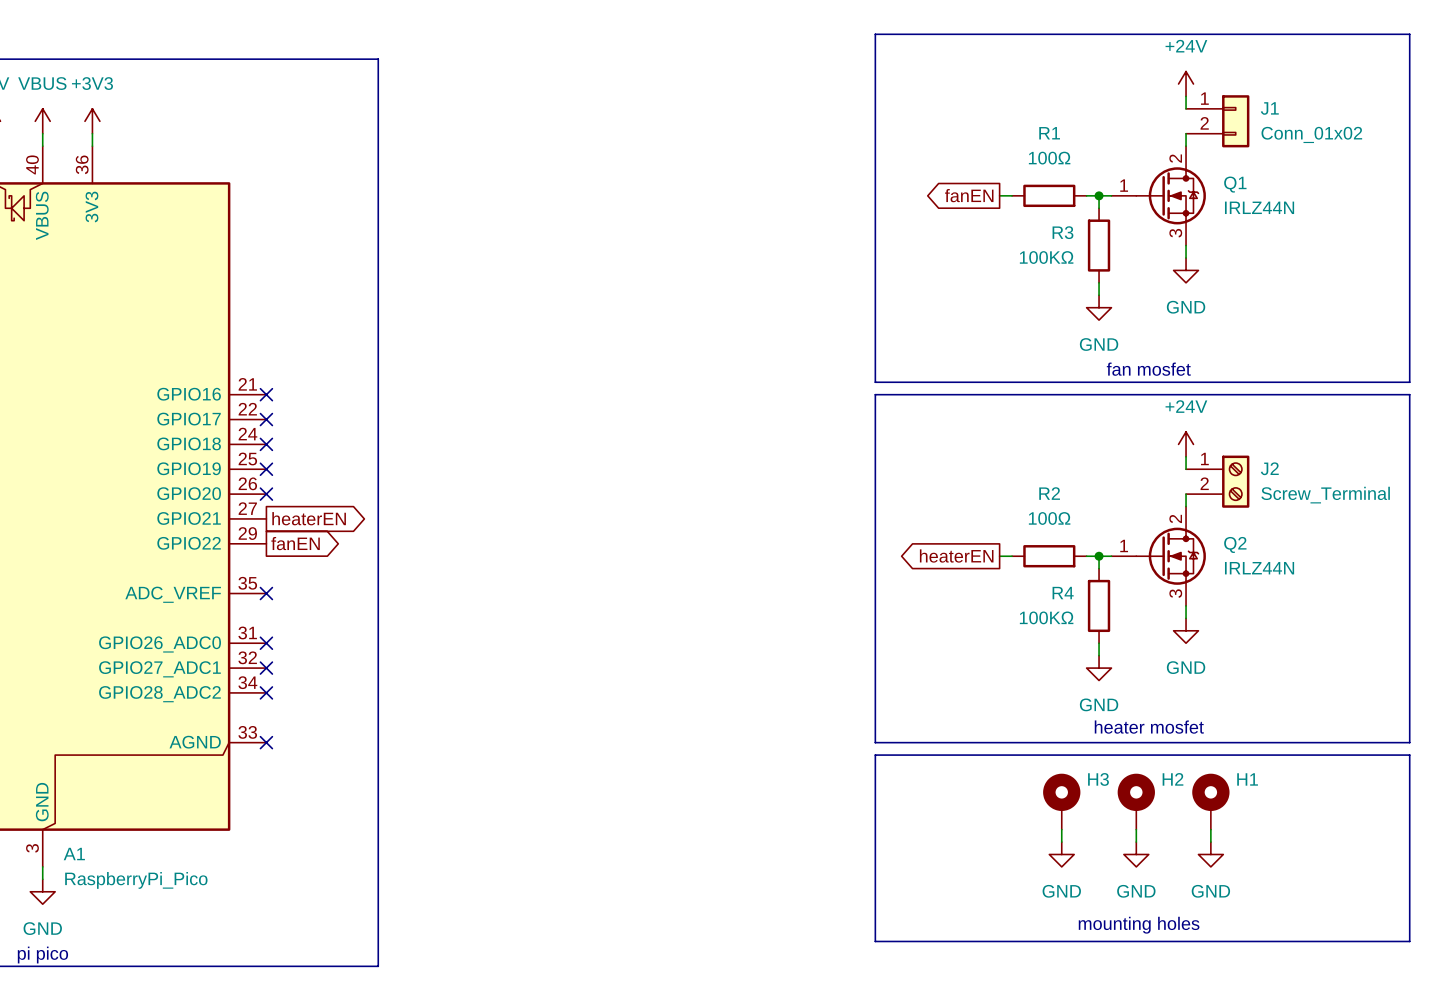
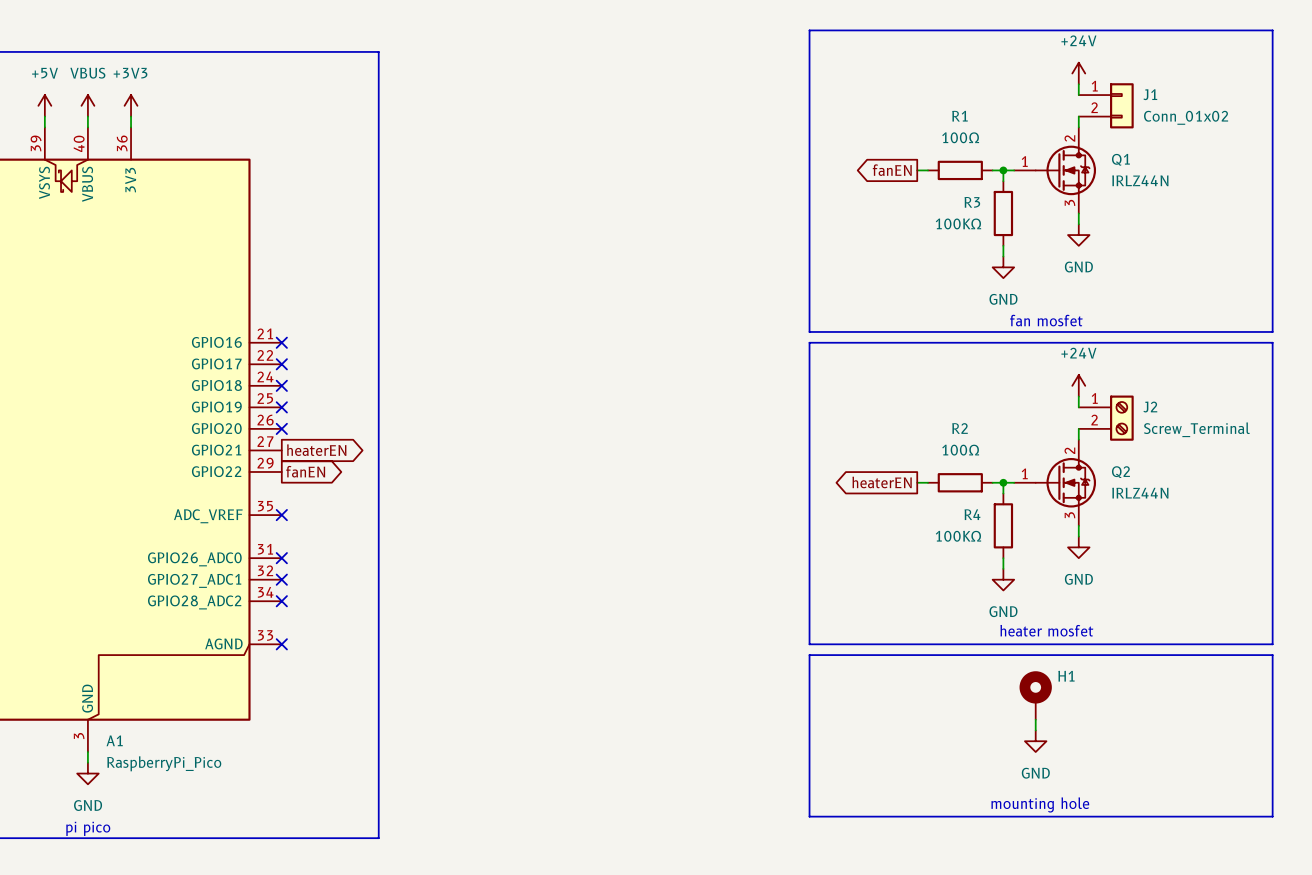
H2 name: H2 (1173, 779) -> H1 (1066, 676)
H3: (1061, 801) -> none
H1: (1210, 801) -> none
wire: (1061, 829) (1061, 842) -> none
wire: (1210, 829) (1210, 842) -> none
power symbol: GND (1061, 854) -> none
power symbol: GND (1210, 854) -> none
text: mounting holes (1139, 925) -> mounting hole (1040, 804)

